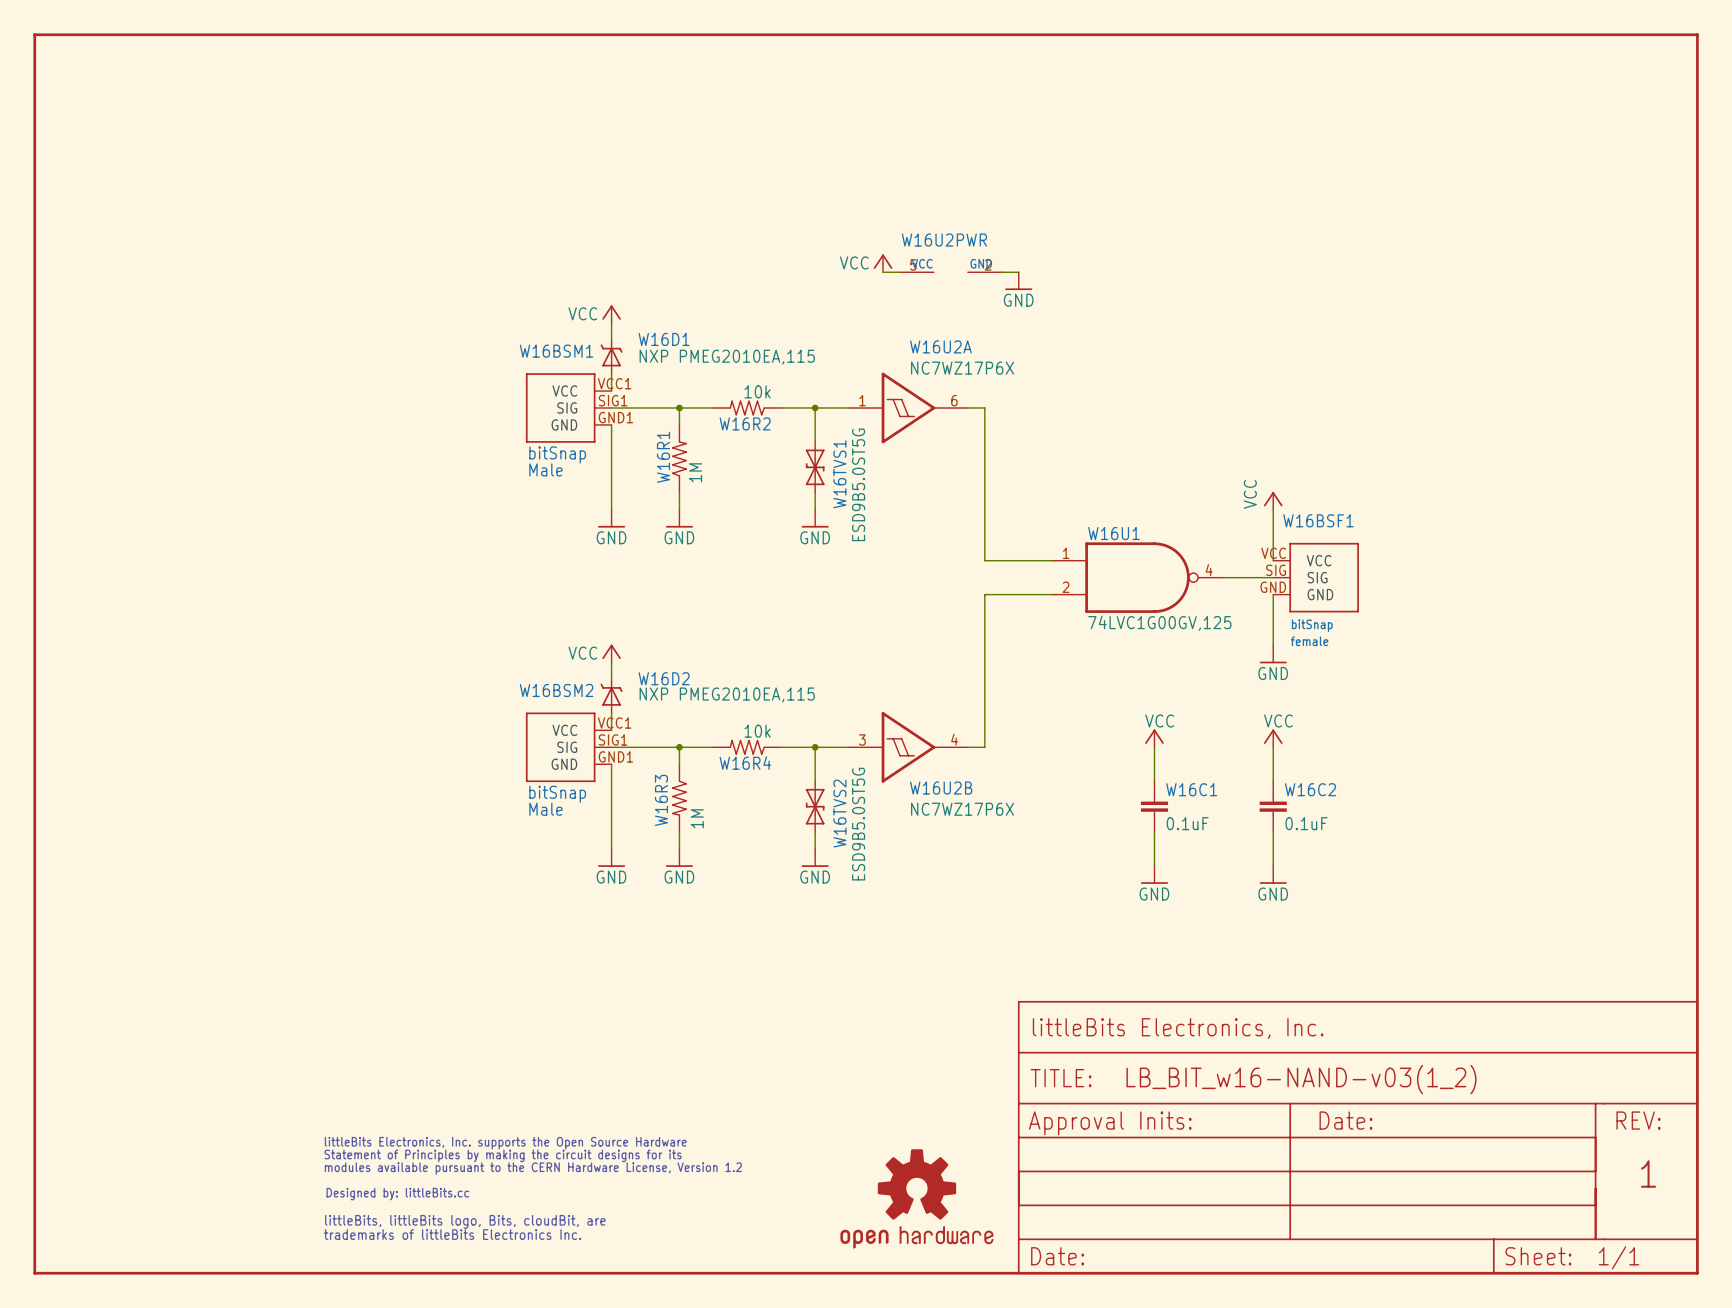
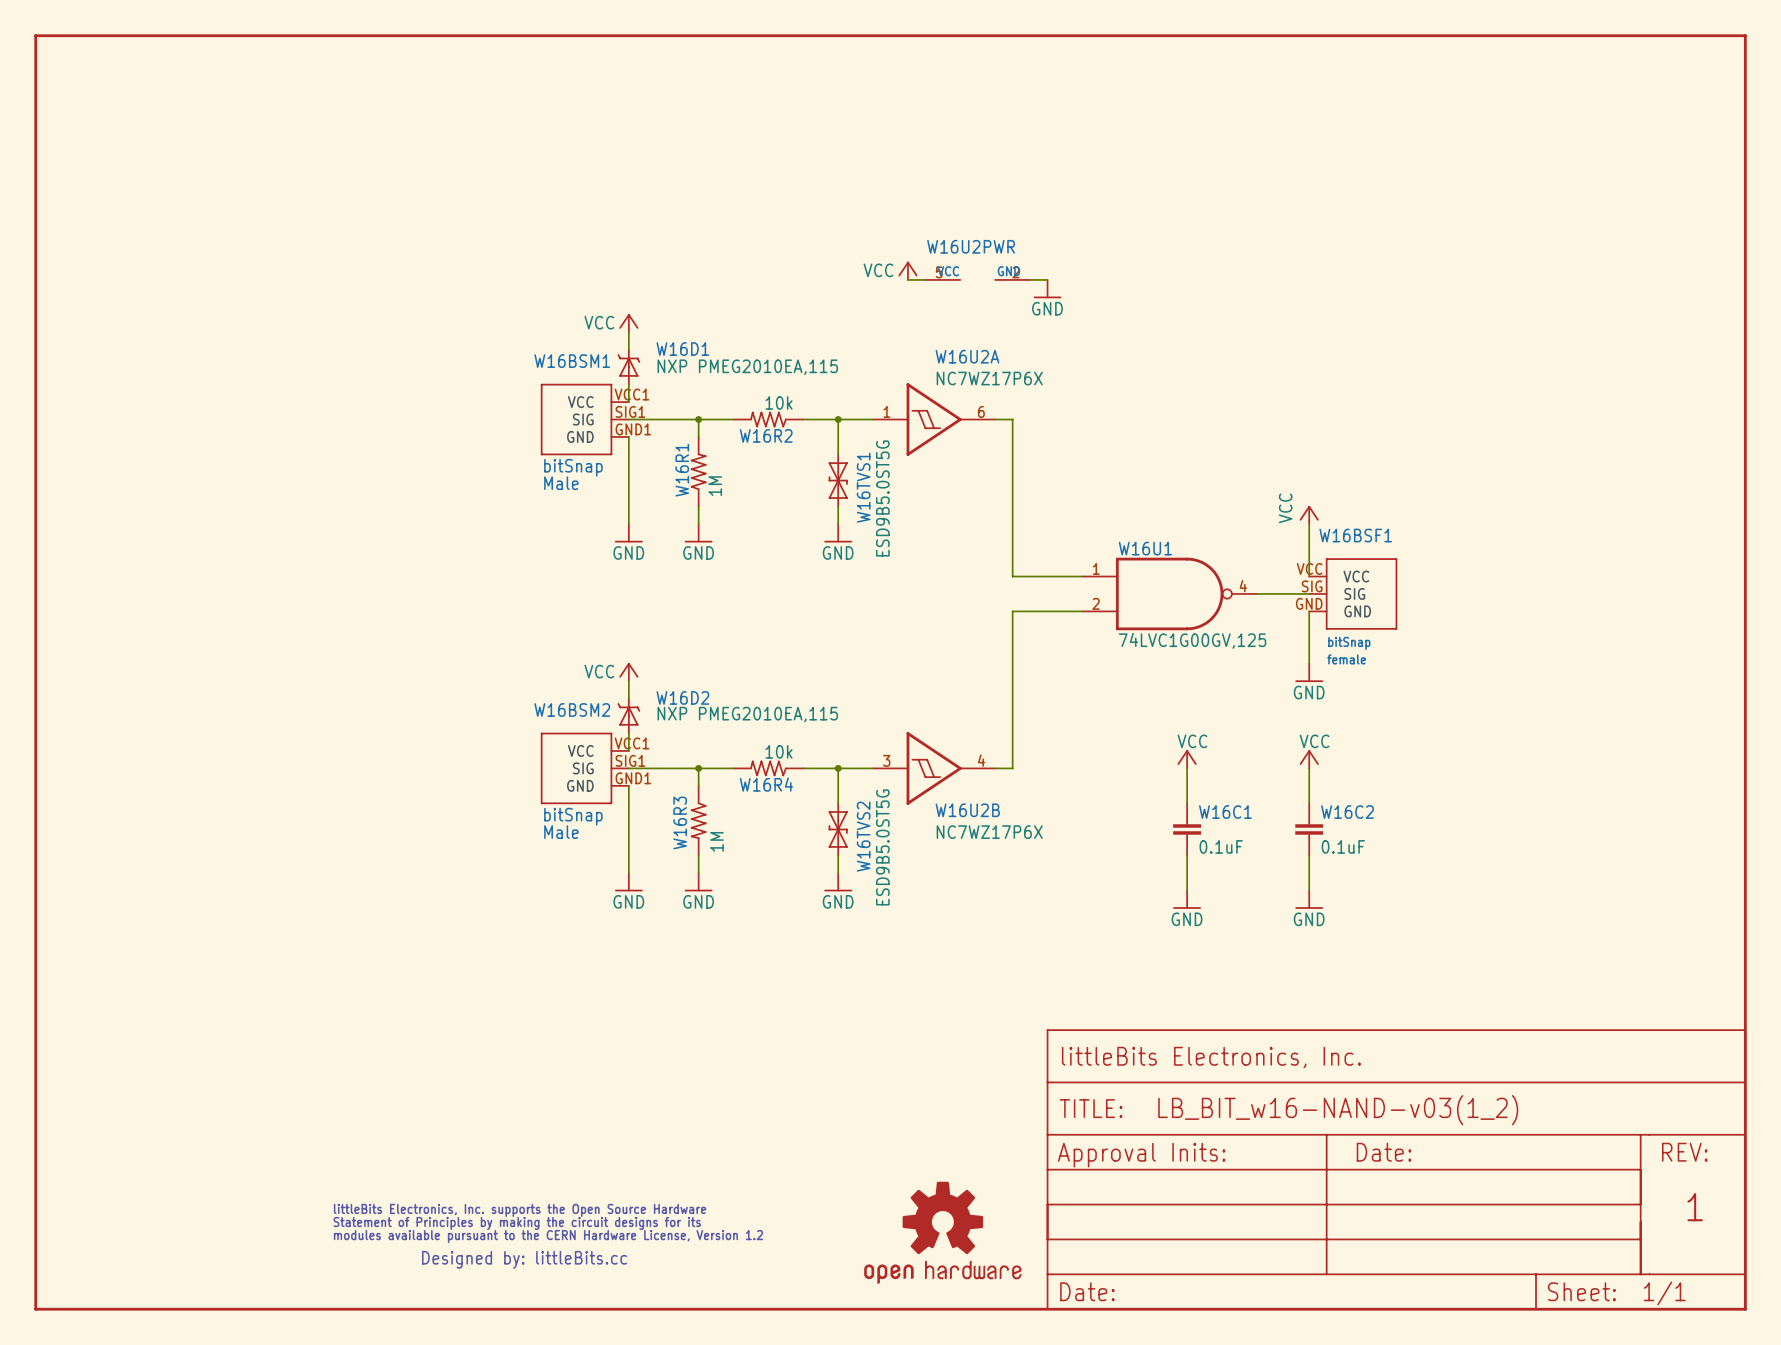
part: (532, 1188) -> none
part: none -> (548, 1236)

